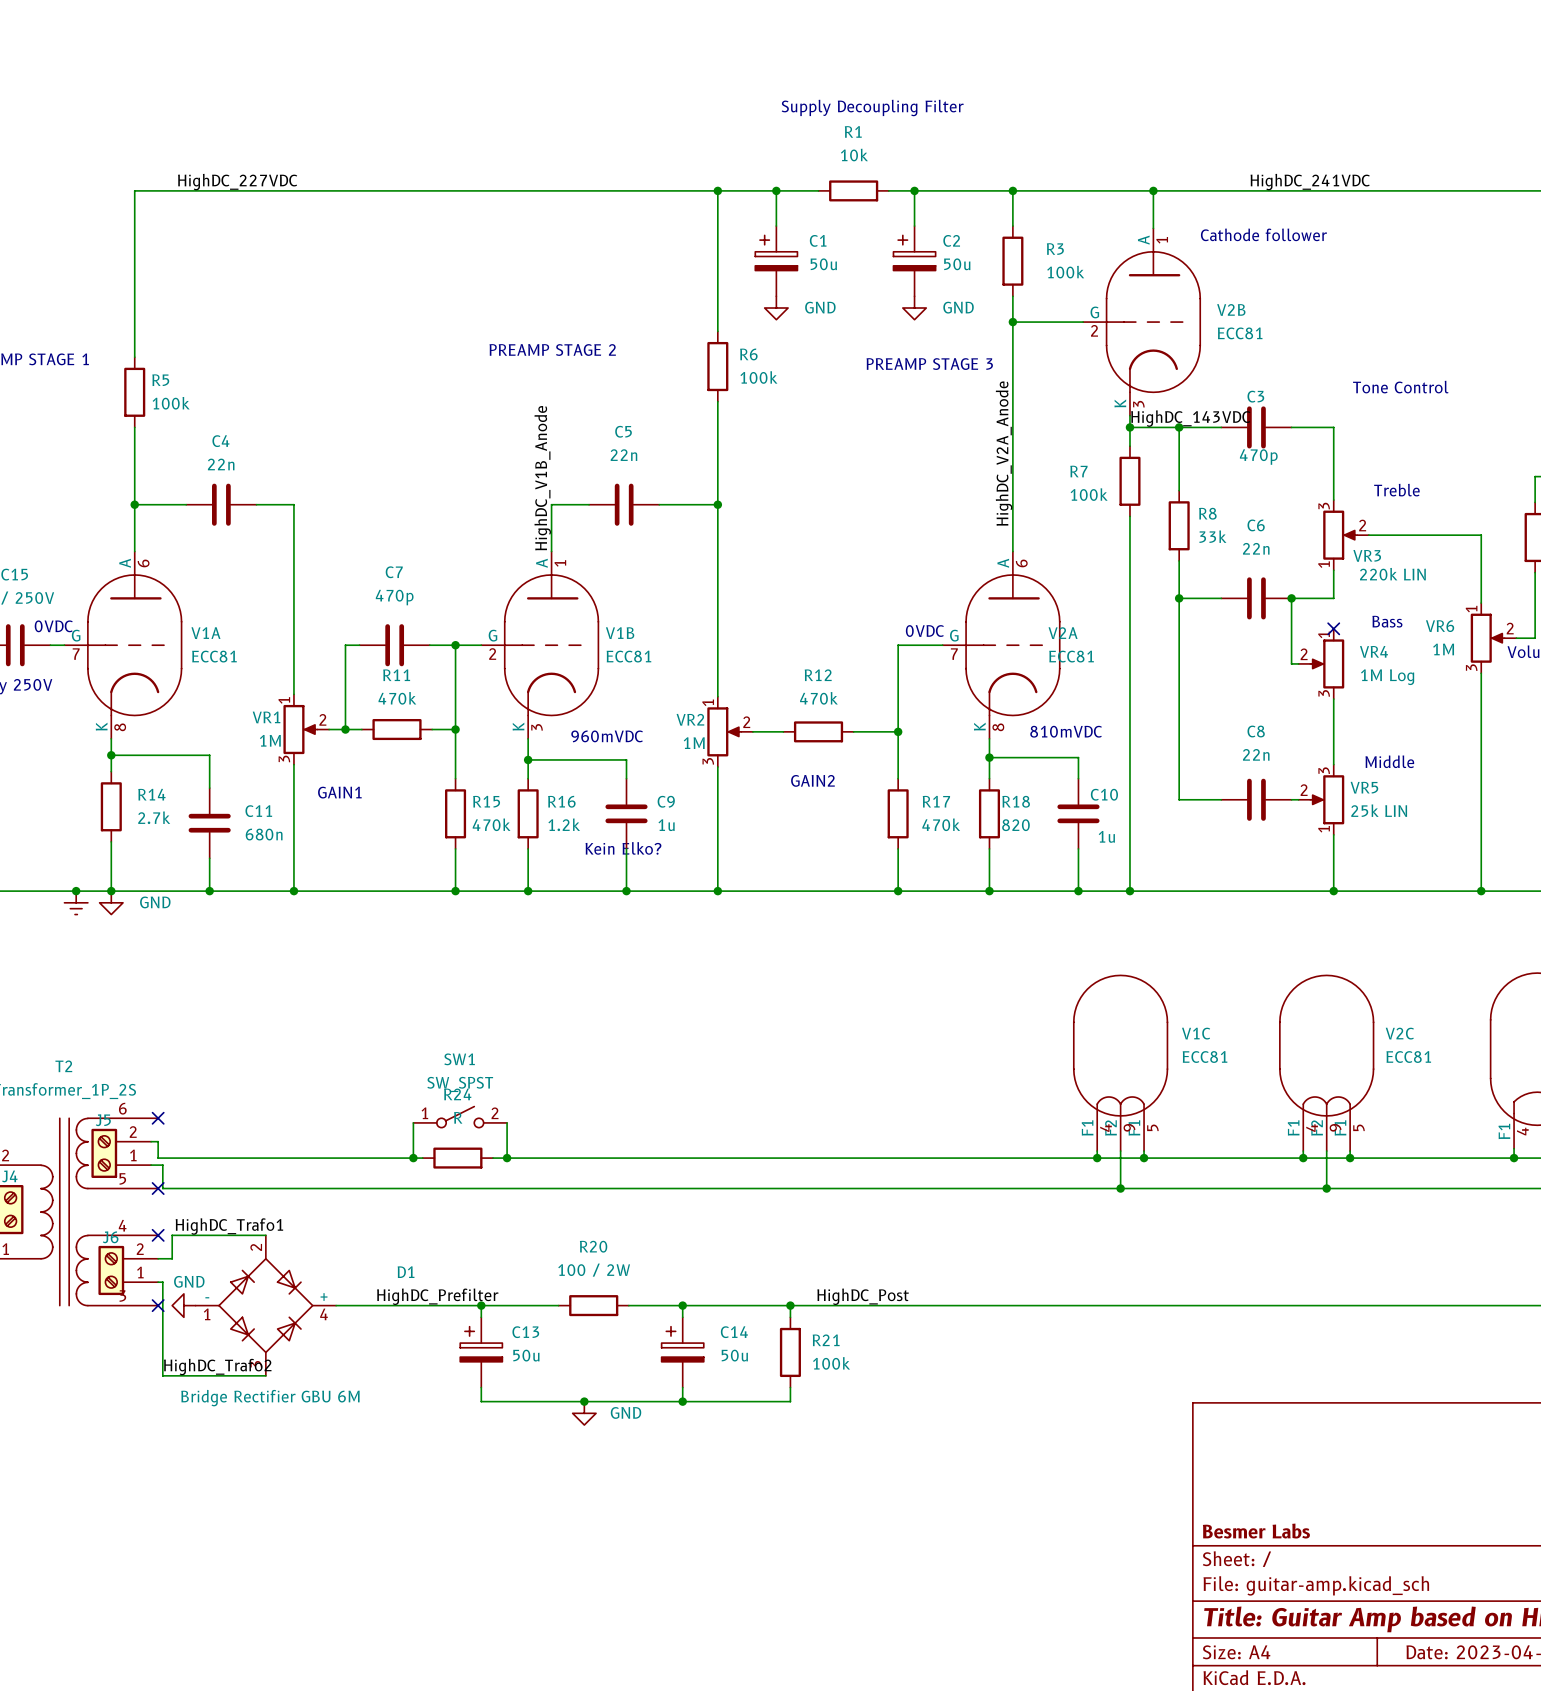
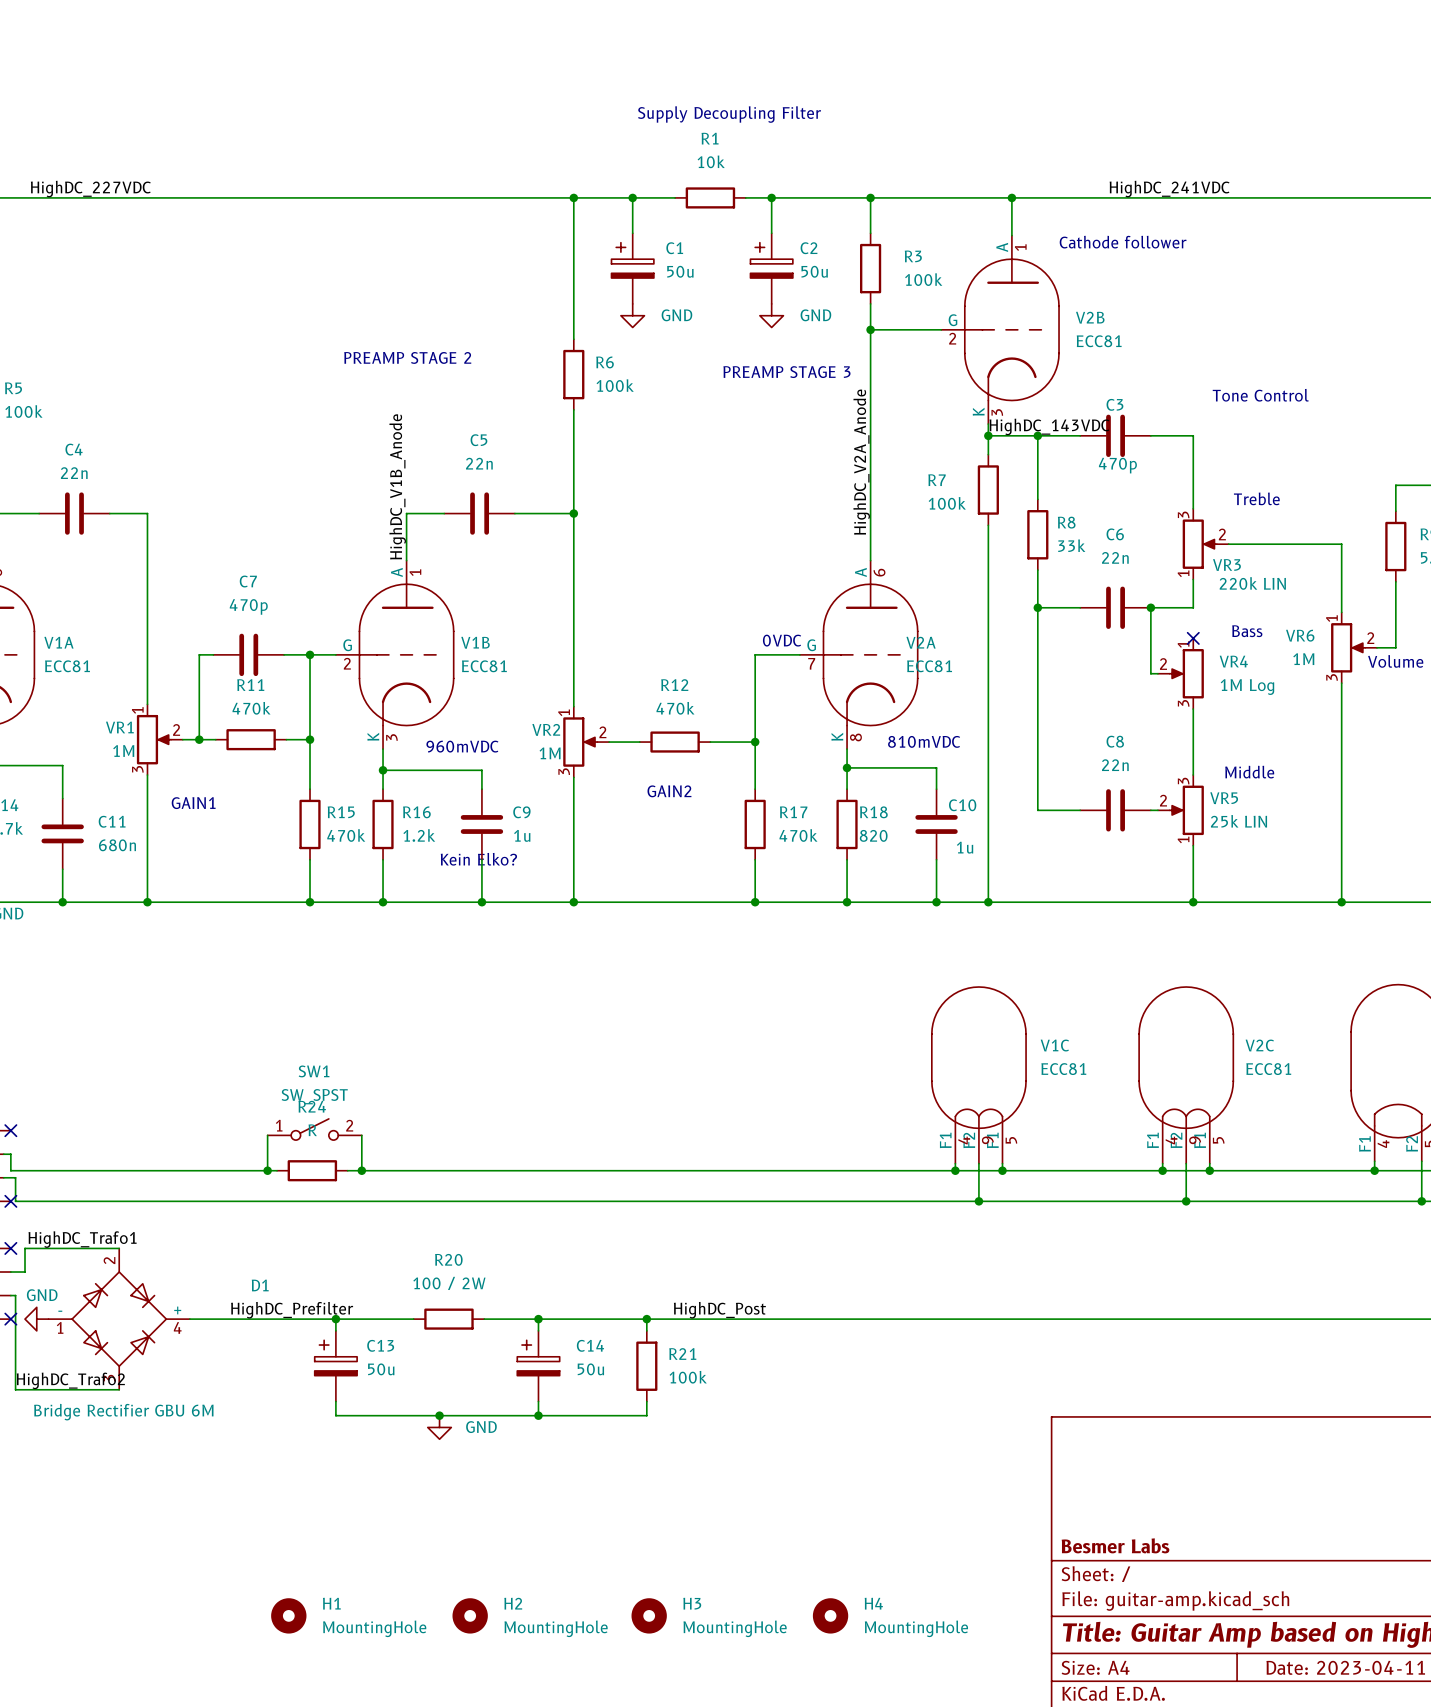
H1: none -> MountingHole (288, 1615)
H2: none -> MountingHole (470, 1615)
H3: none -> MountingHole (649, 1615)
H4: none -> MountingHole (830, 1615)

